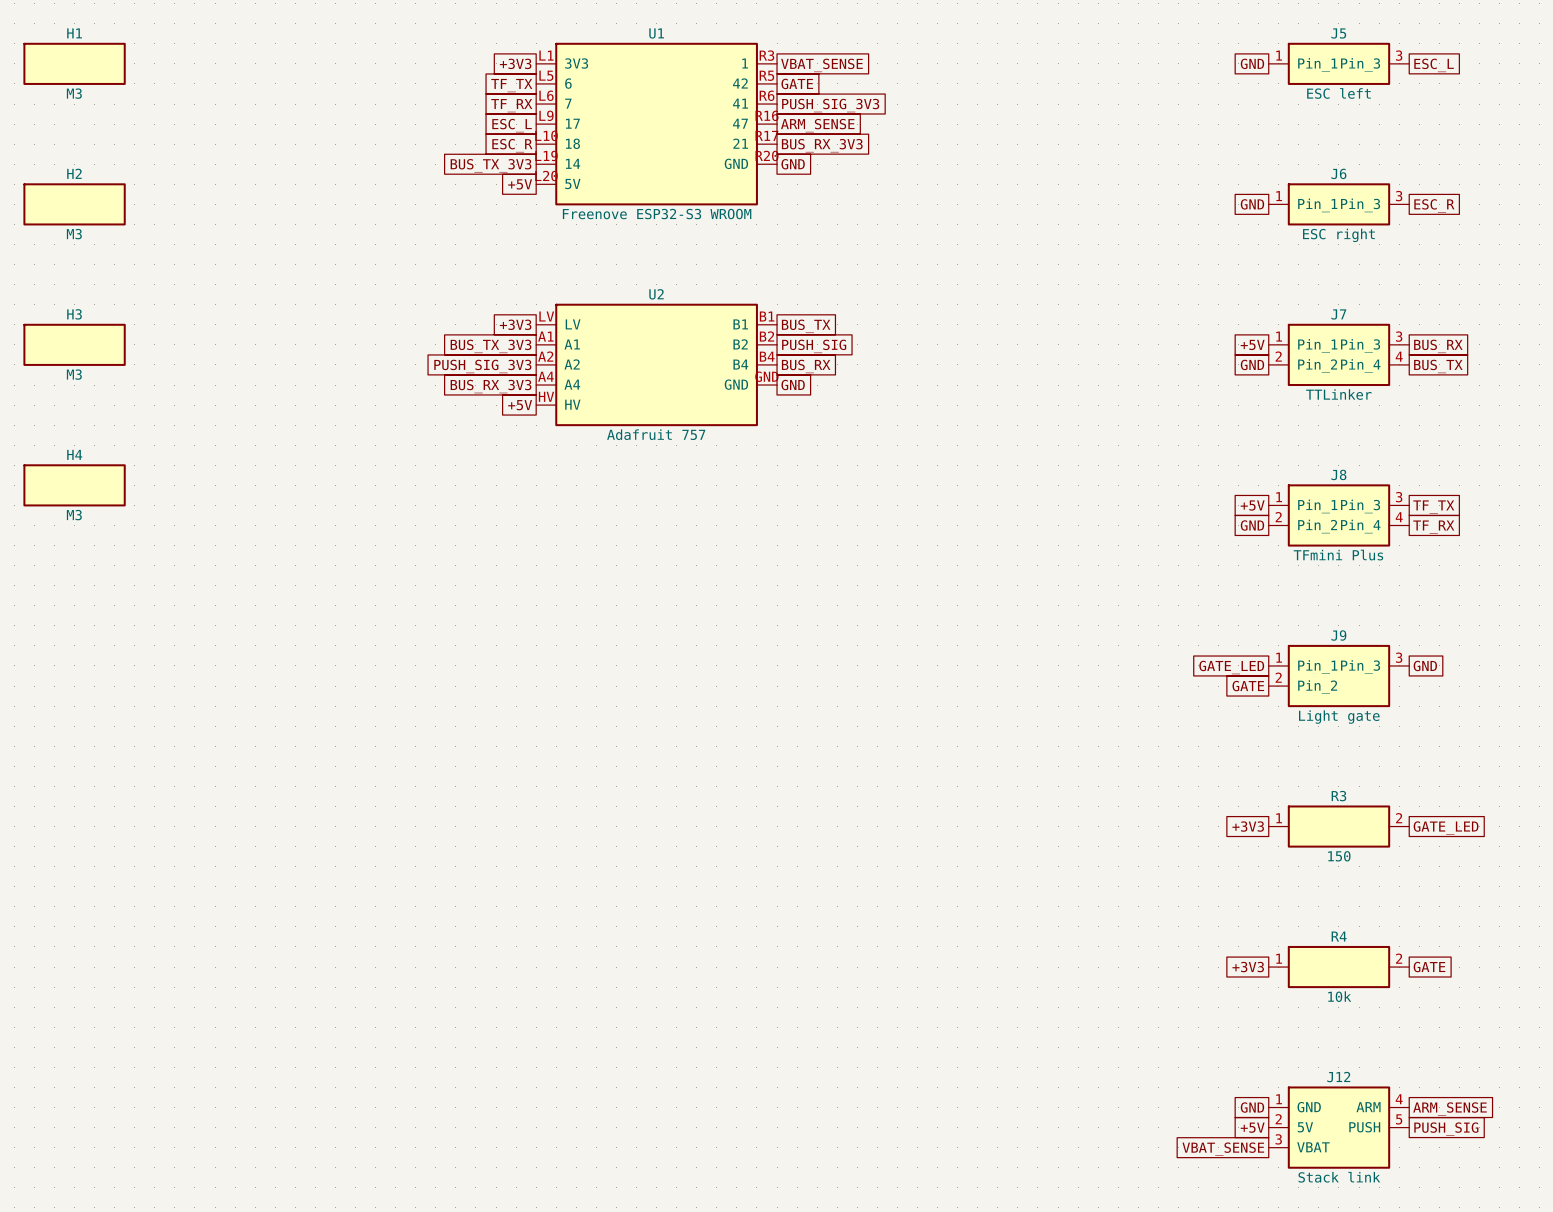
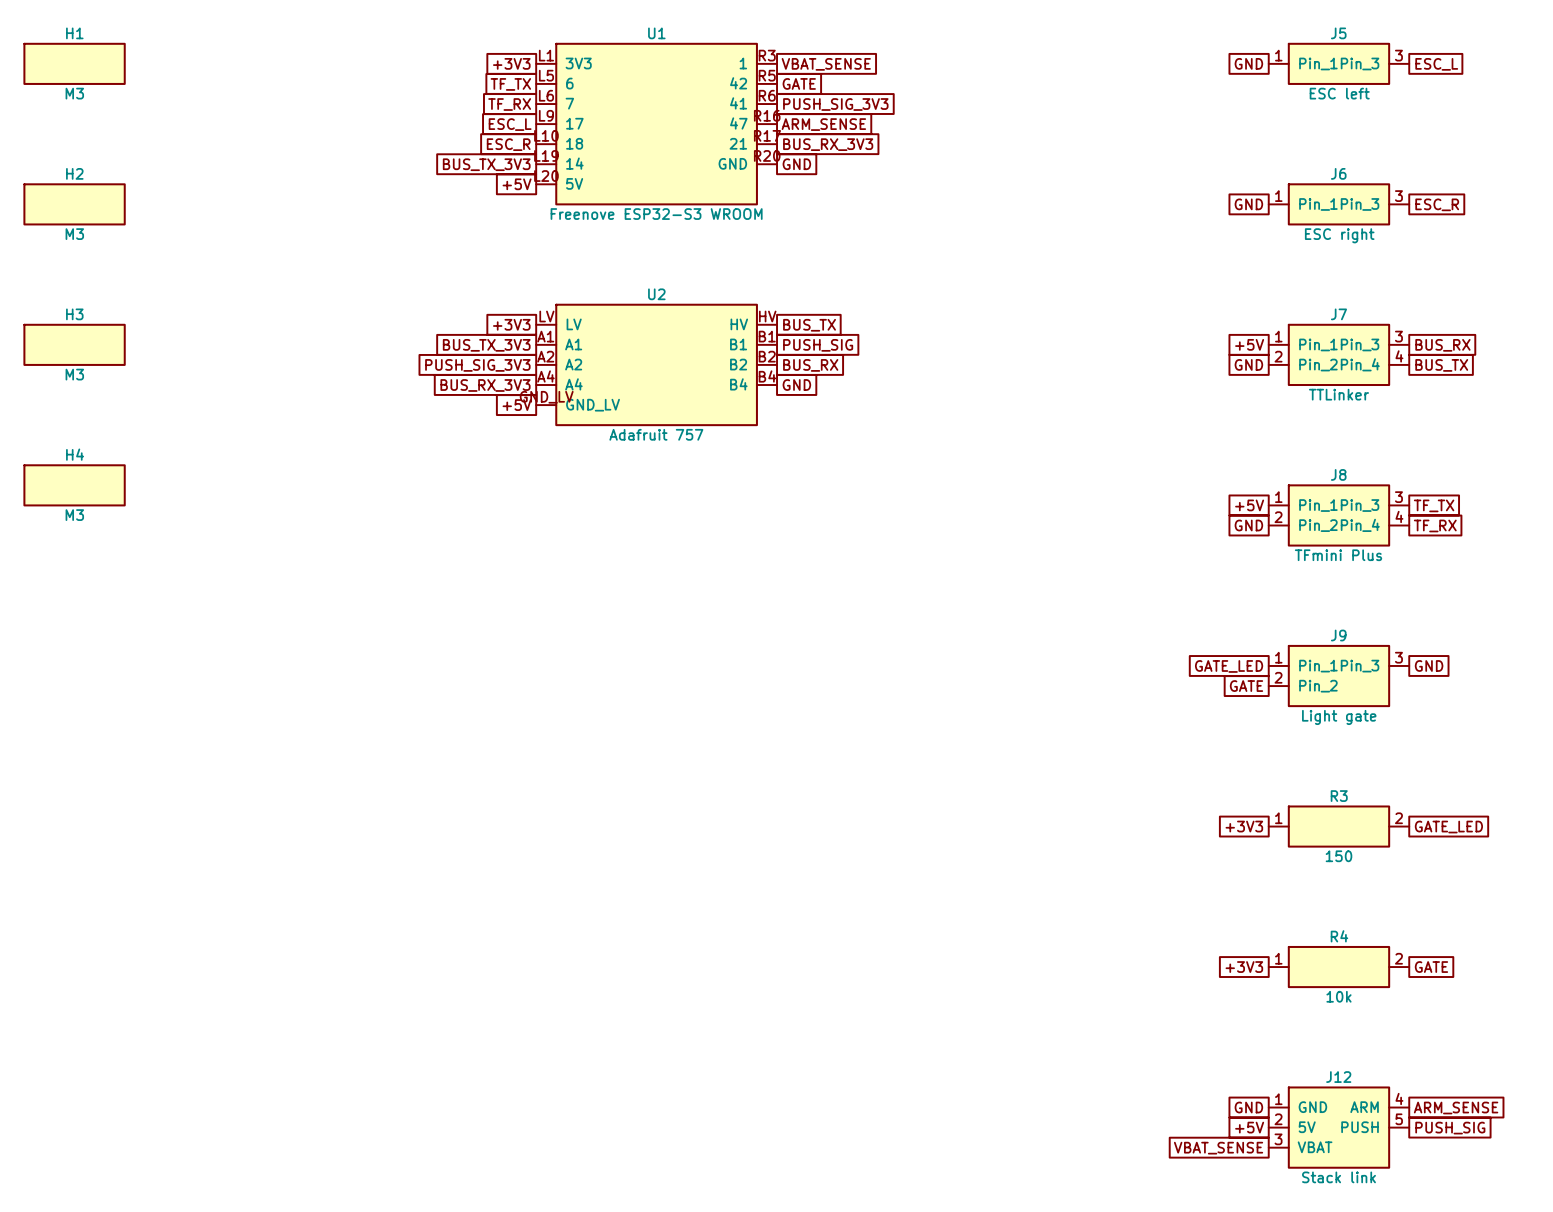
U2 symbol: [536, 303, 778, 427] -> [536, 303, 778, 427]

